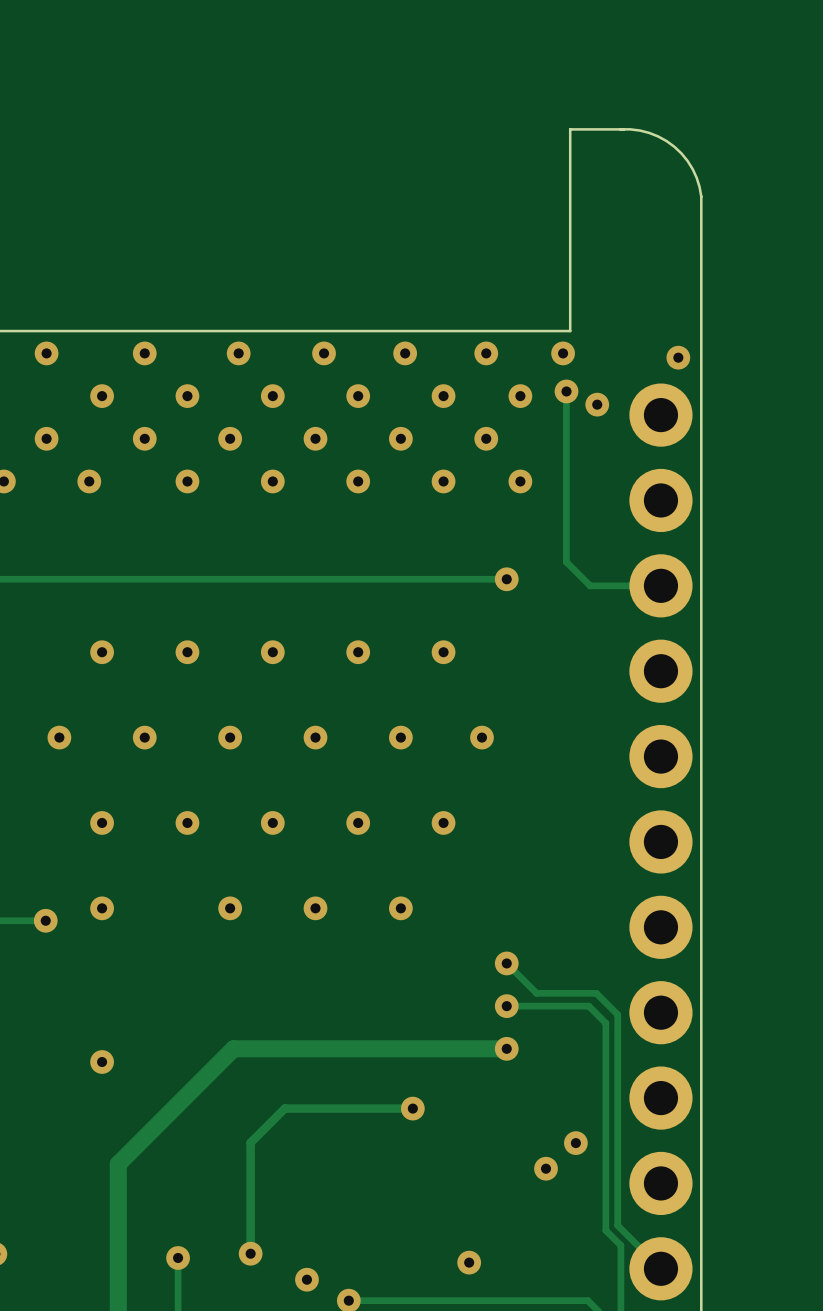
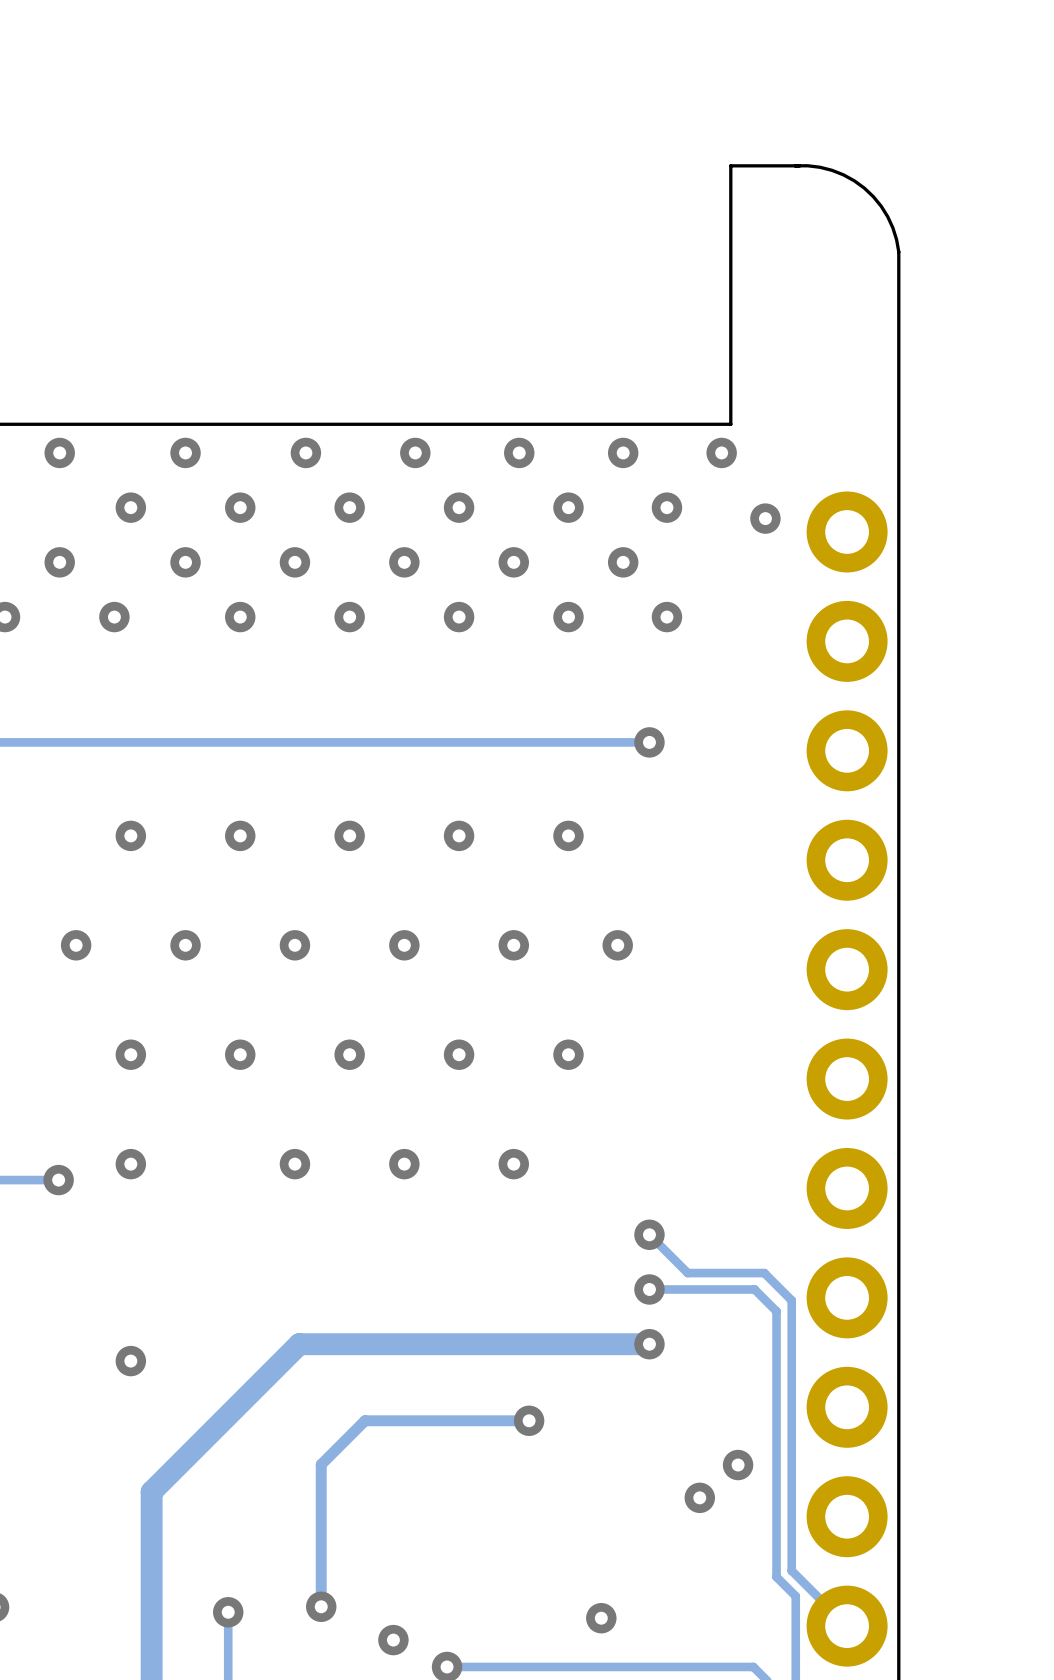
via: (678, 357) -> none
track: (566, 391) (566, 562) (590, 585) (660, 585) -> none
via: (566, 391) -> none

